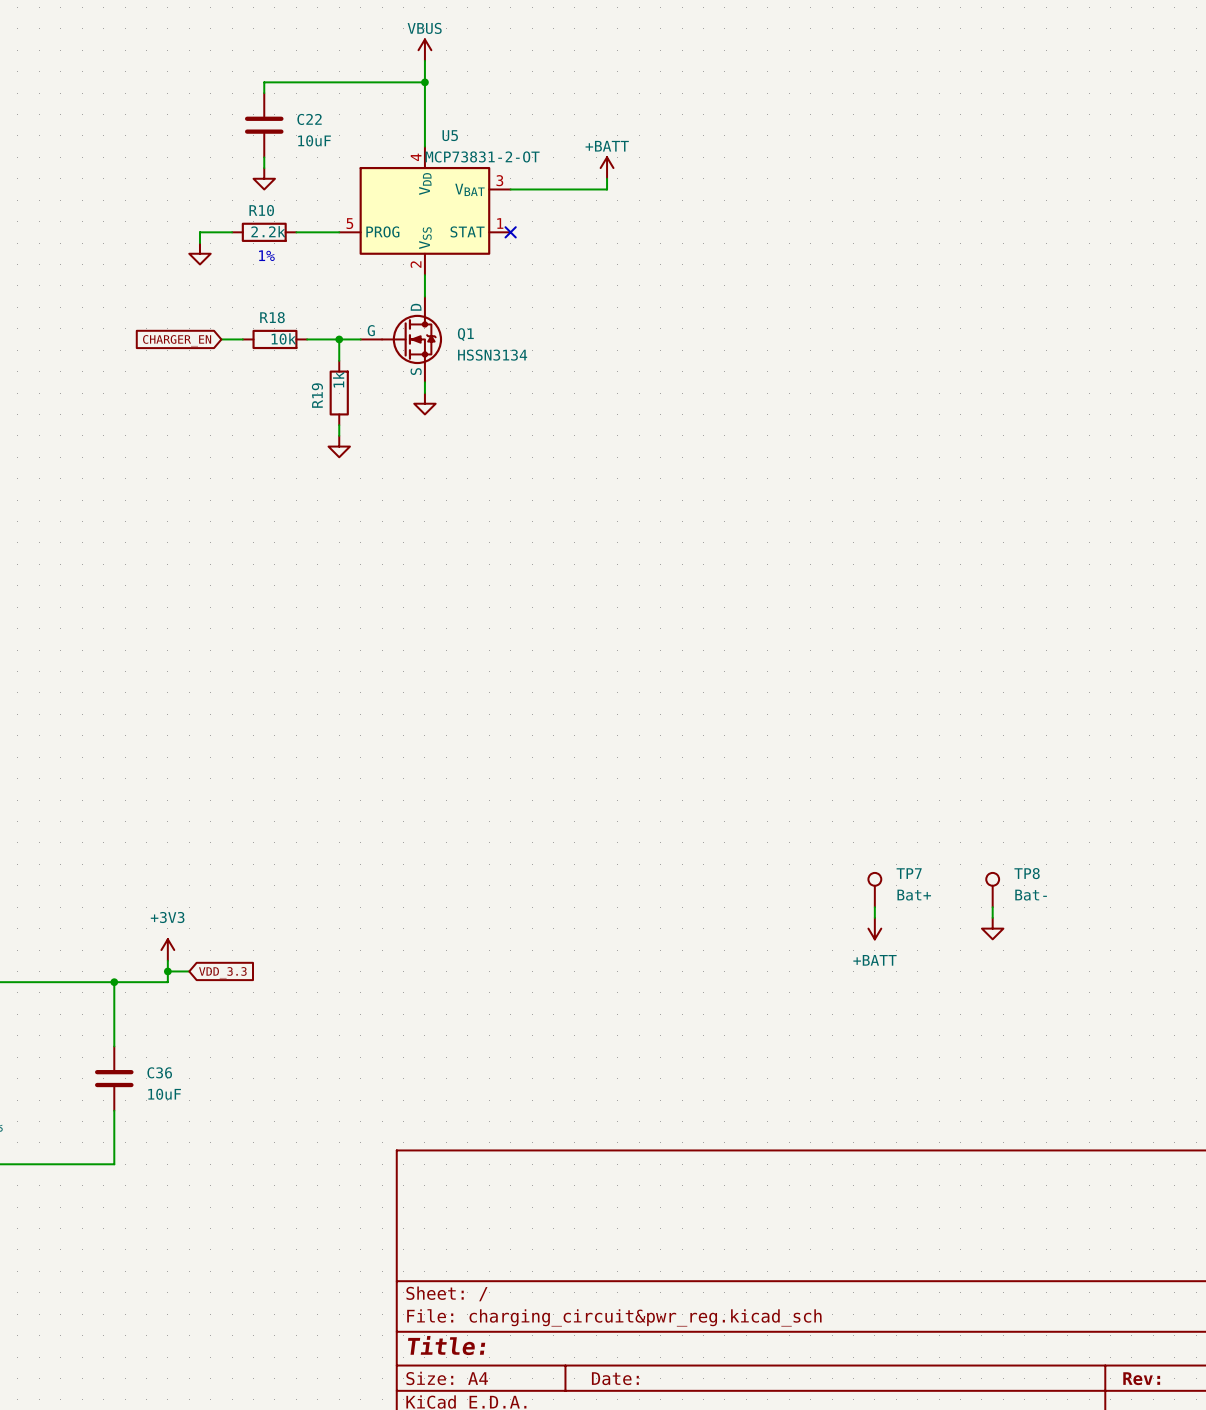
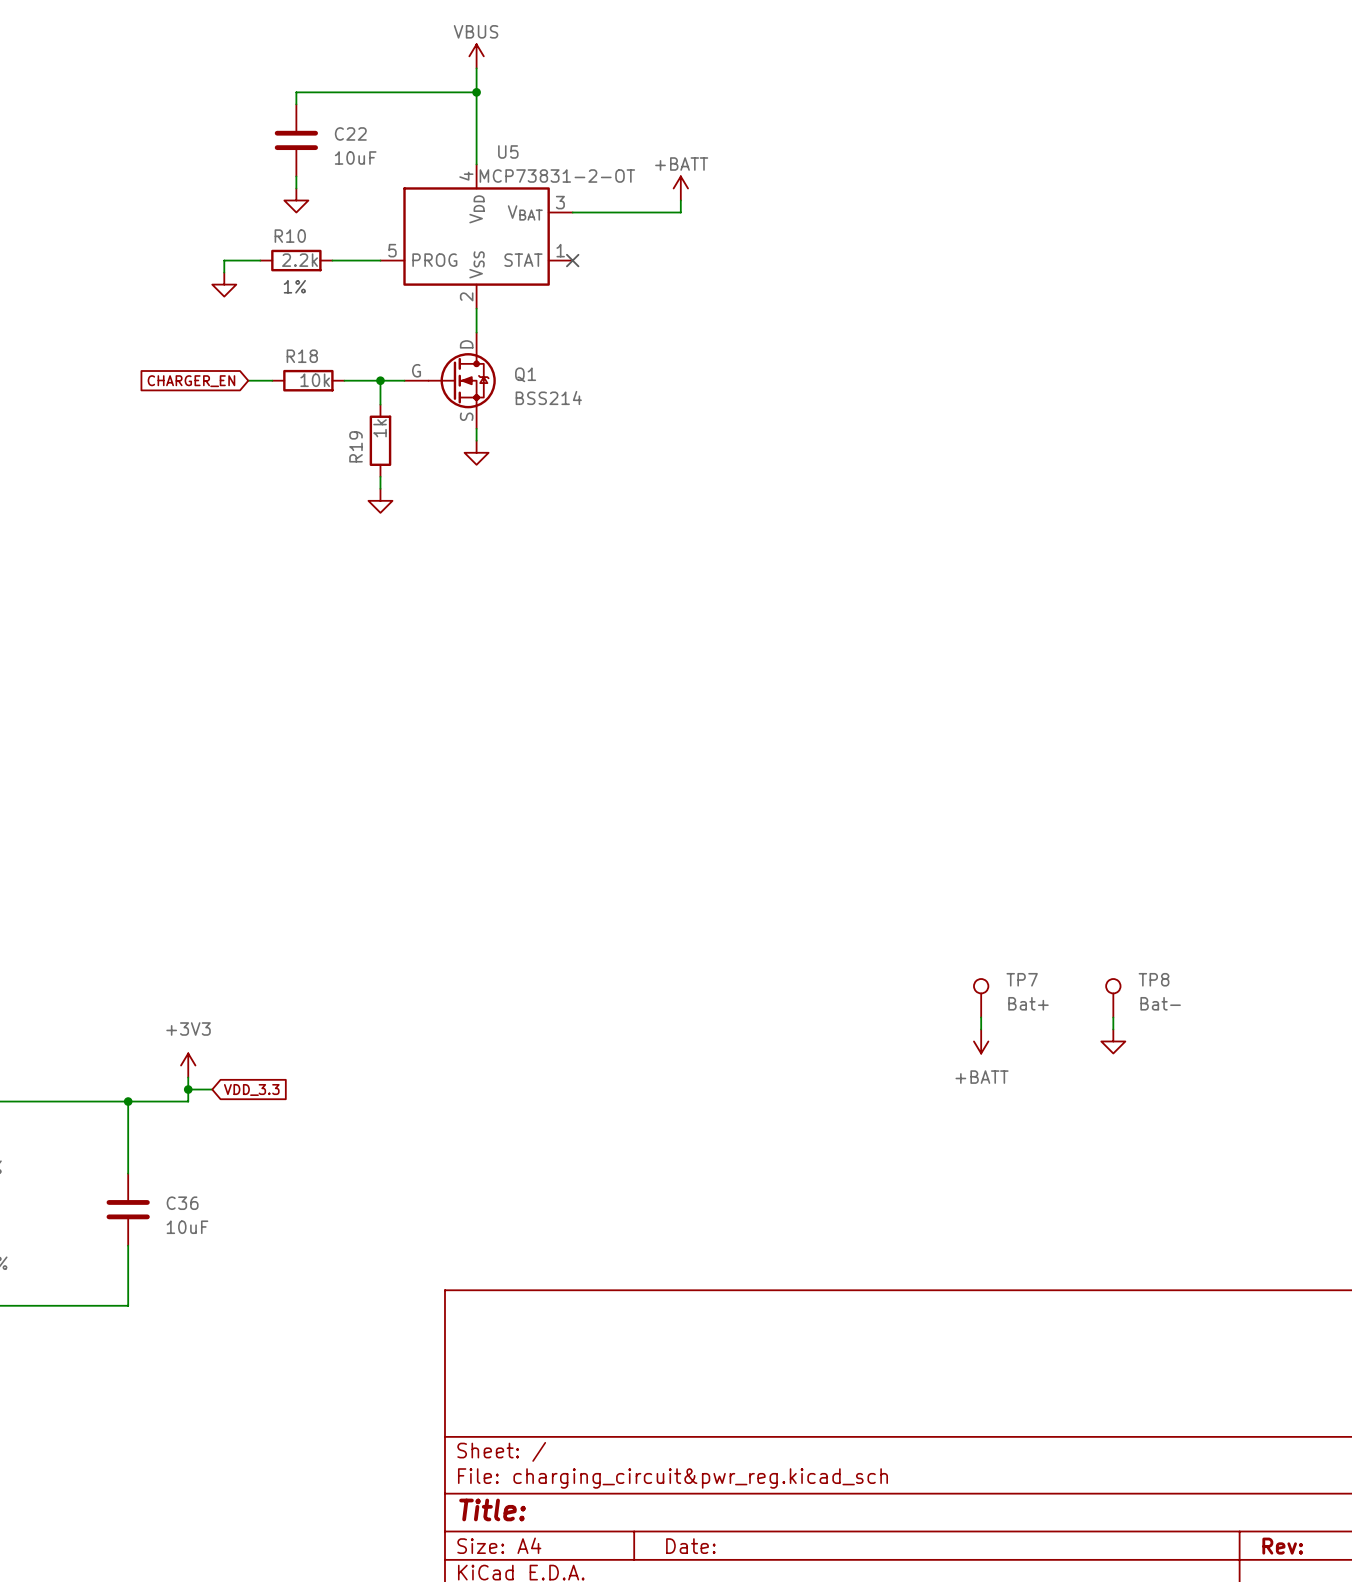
Q1 value: HSSN3134 (492, 355) -> BSS214 (548, 397)

